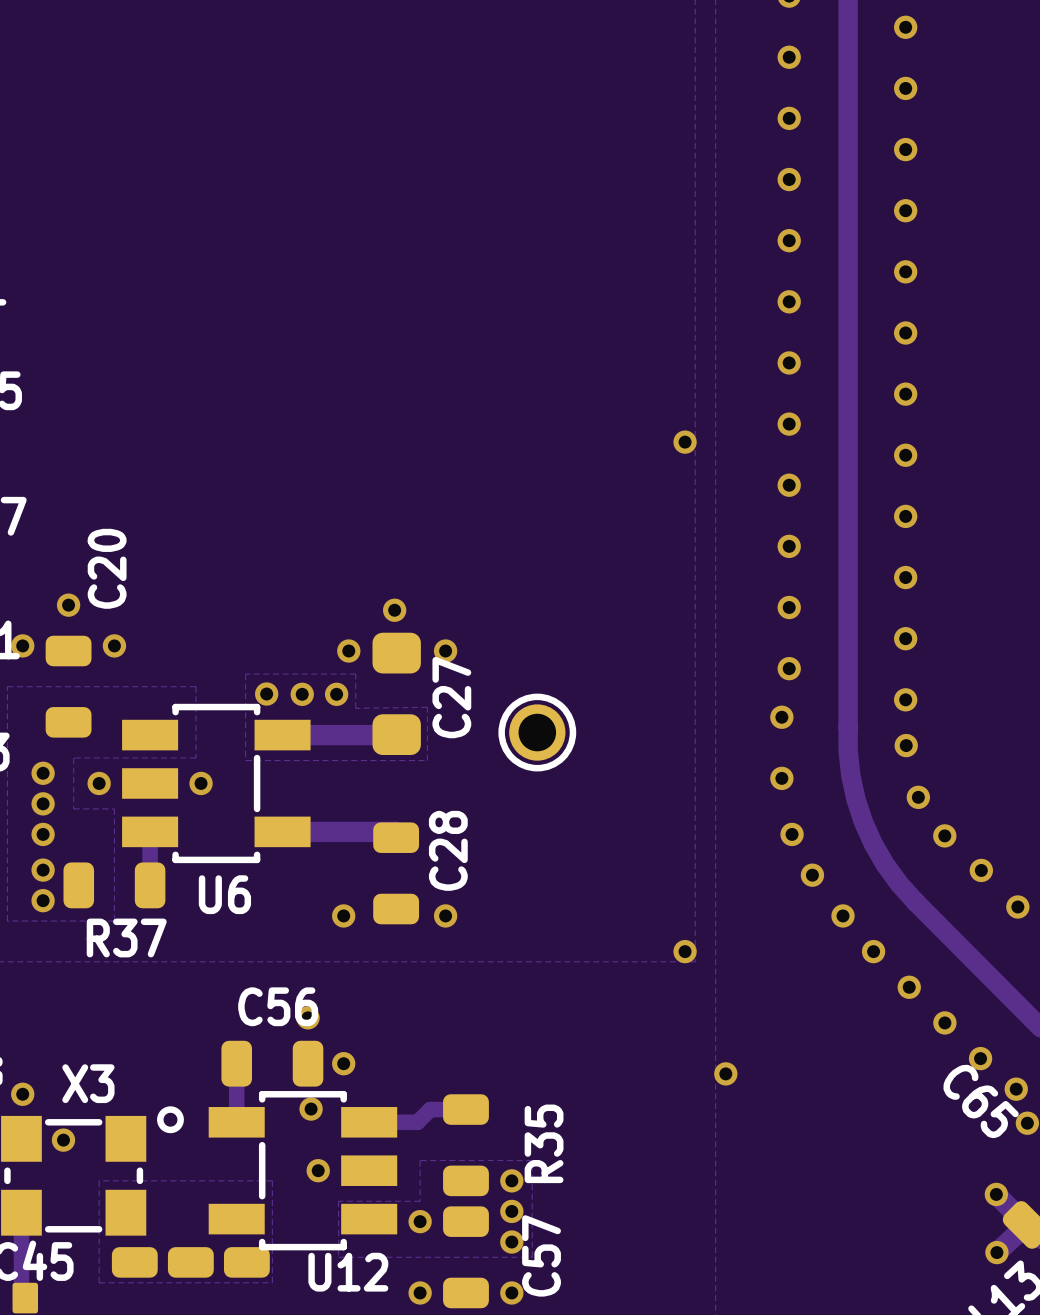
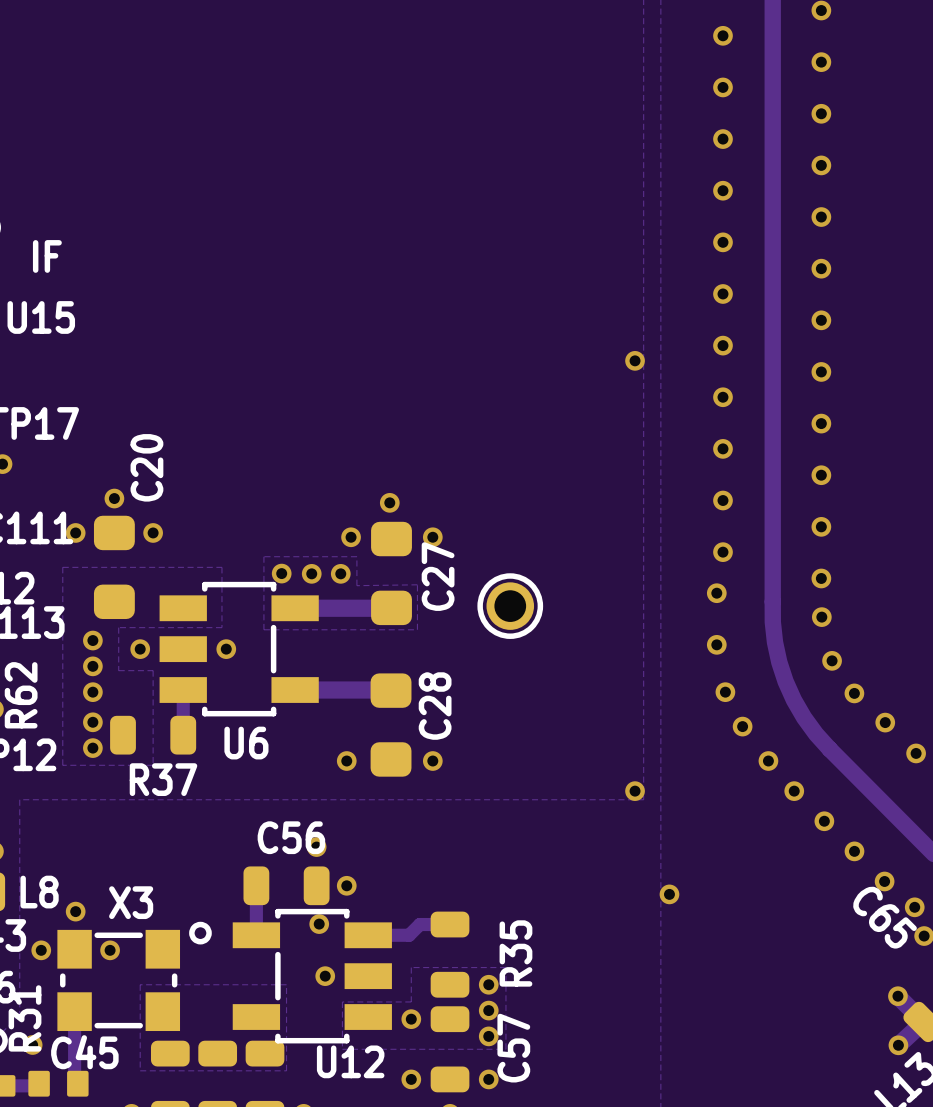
C20 footprint: [45, 635, 92, 738] -> [93, 515, 135, 620]
C28 footprint: [373, 822, 420, 925] -> [370, 673, 412, 777]

